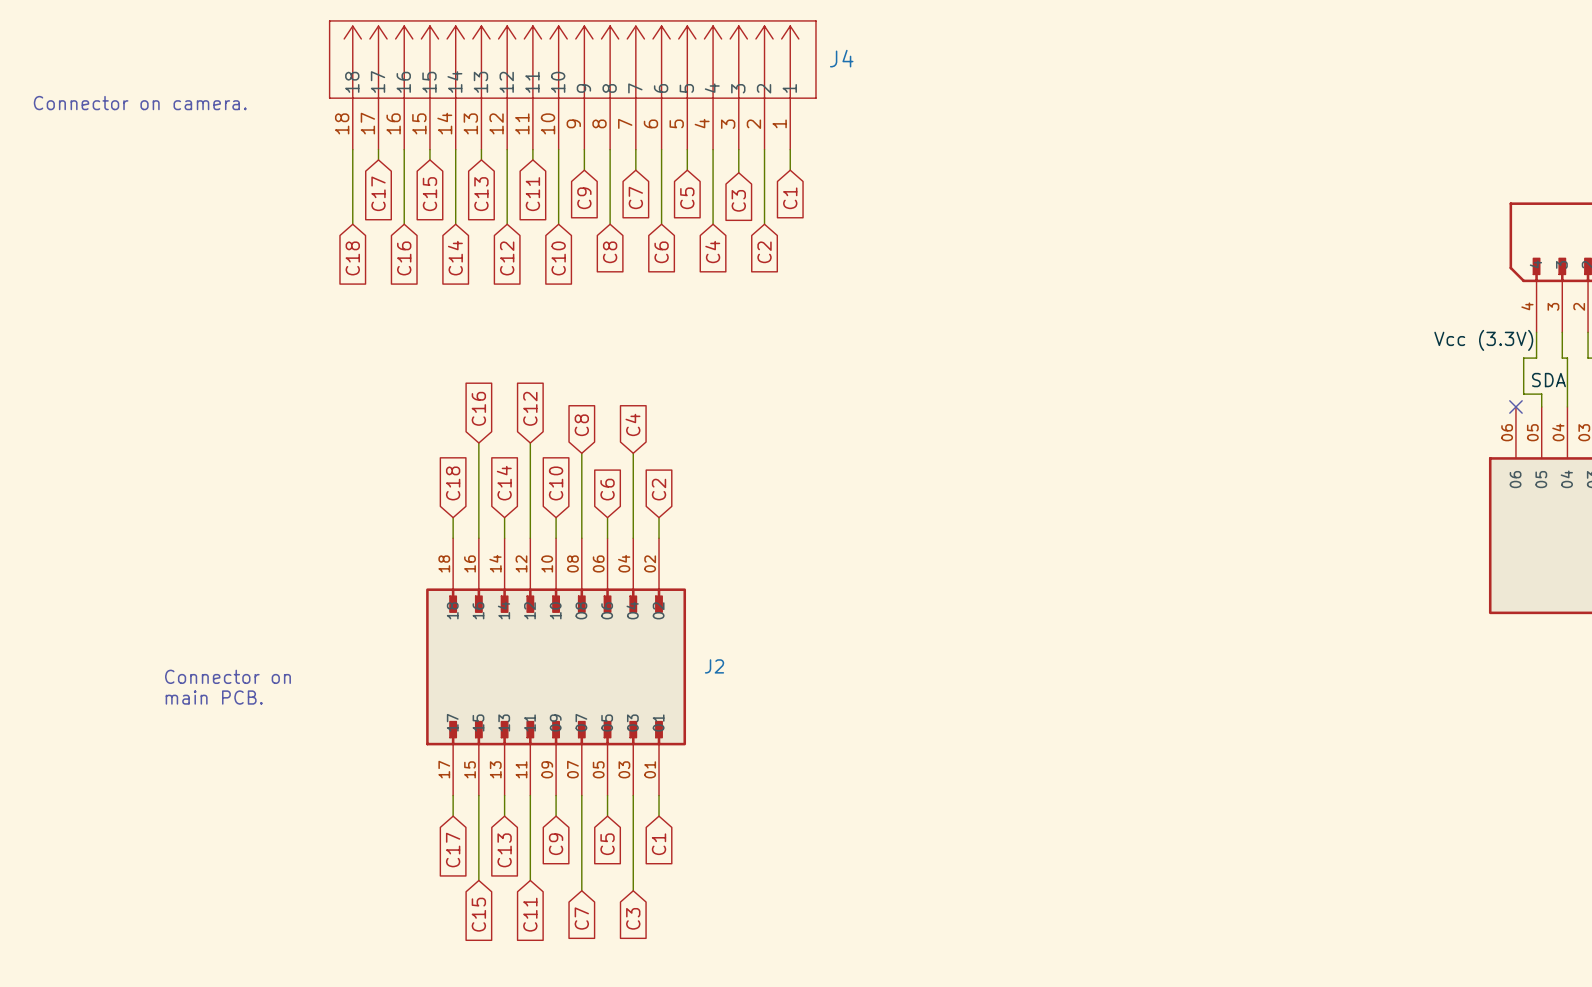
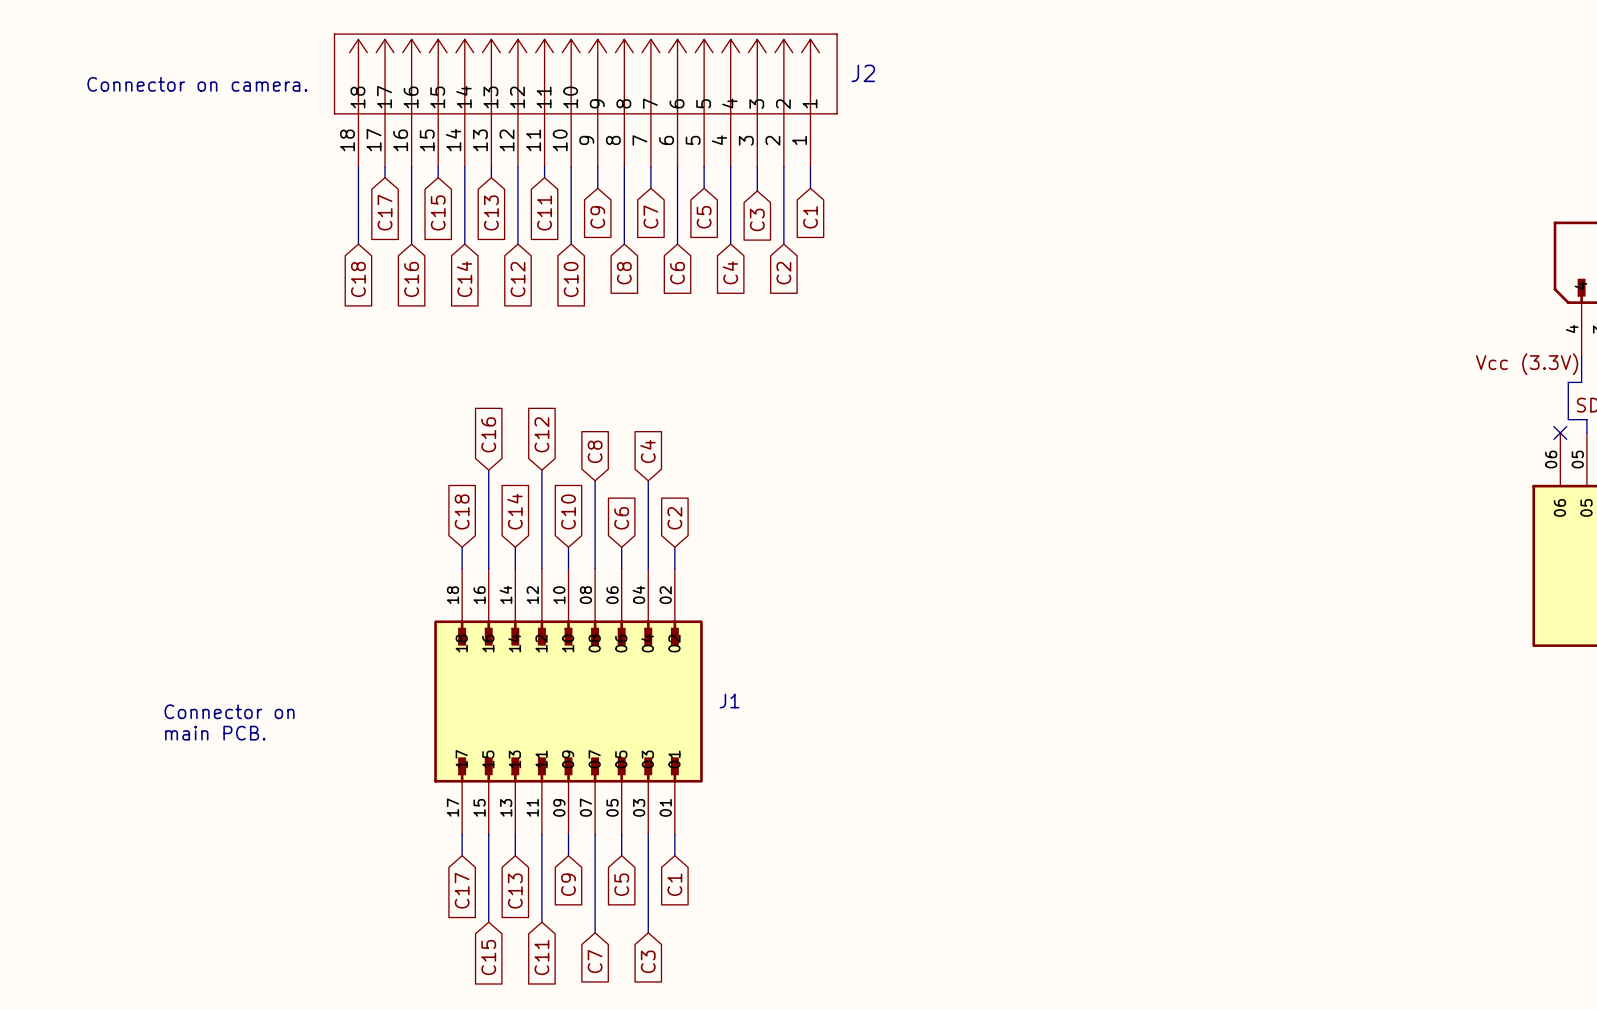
J4 name: J4 (841, 58) -> J2 (863, 73)
text position: Connector on camera. (140, 103) -> Connector on camera. (197, 84)
J2 name: J2 (714, 666) -> J1 (729, 701)

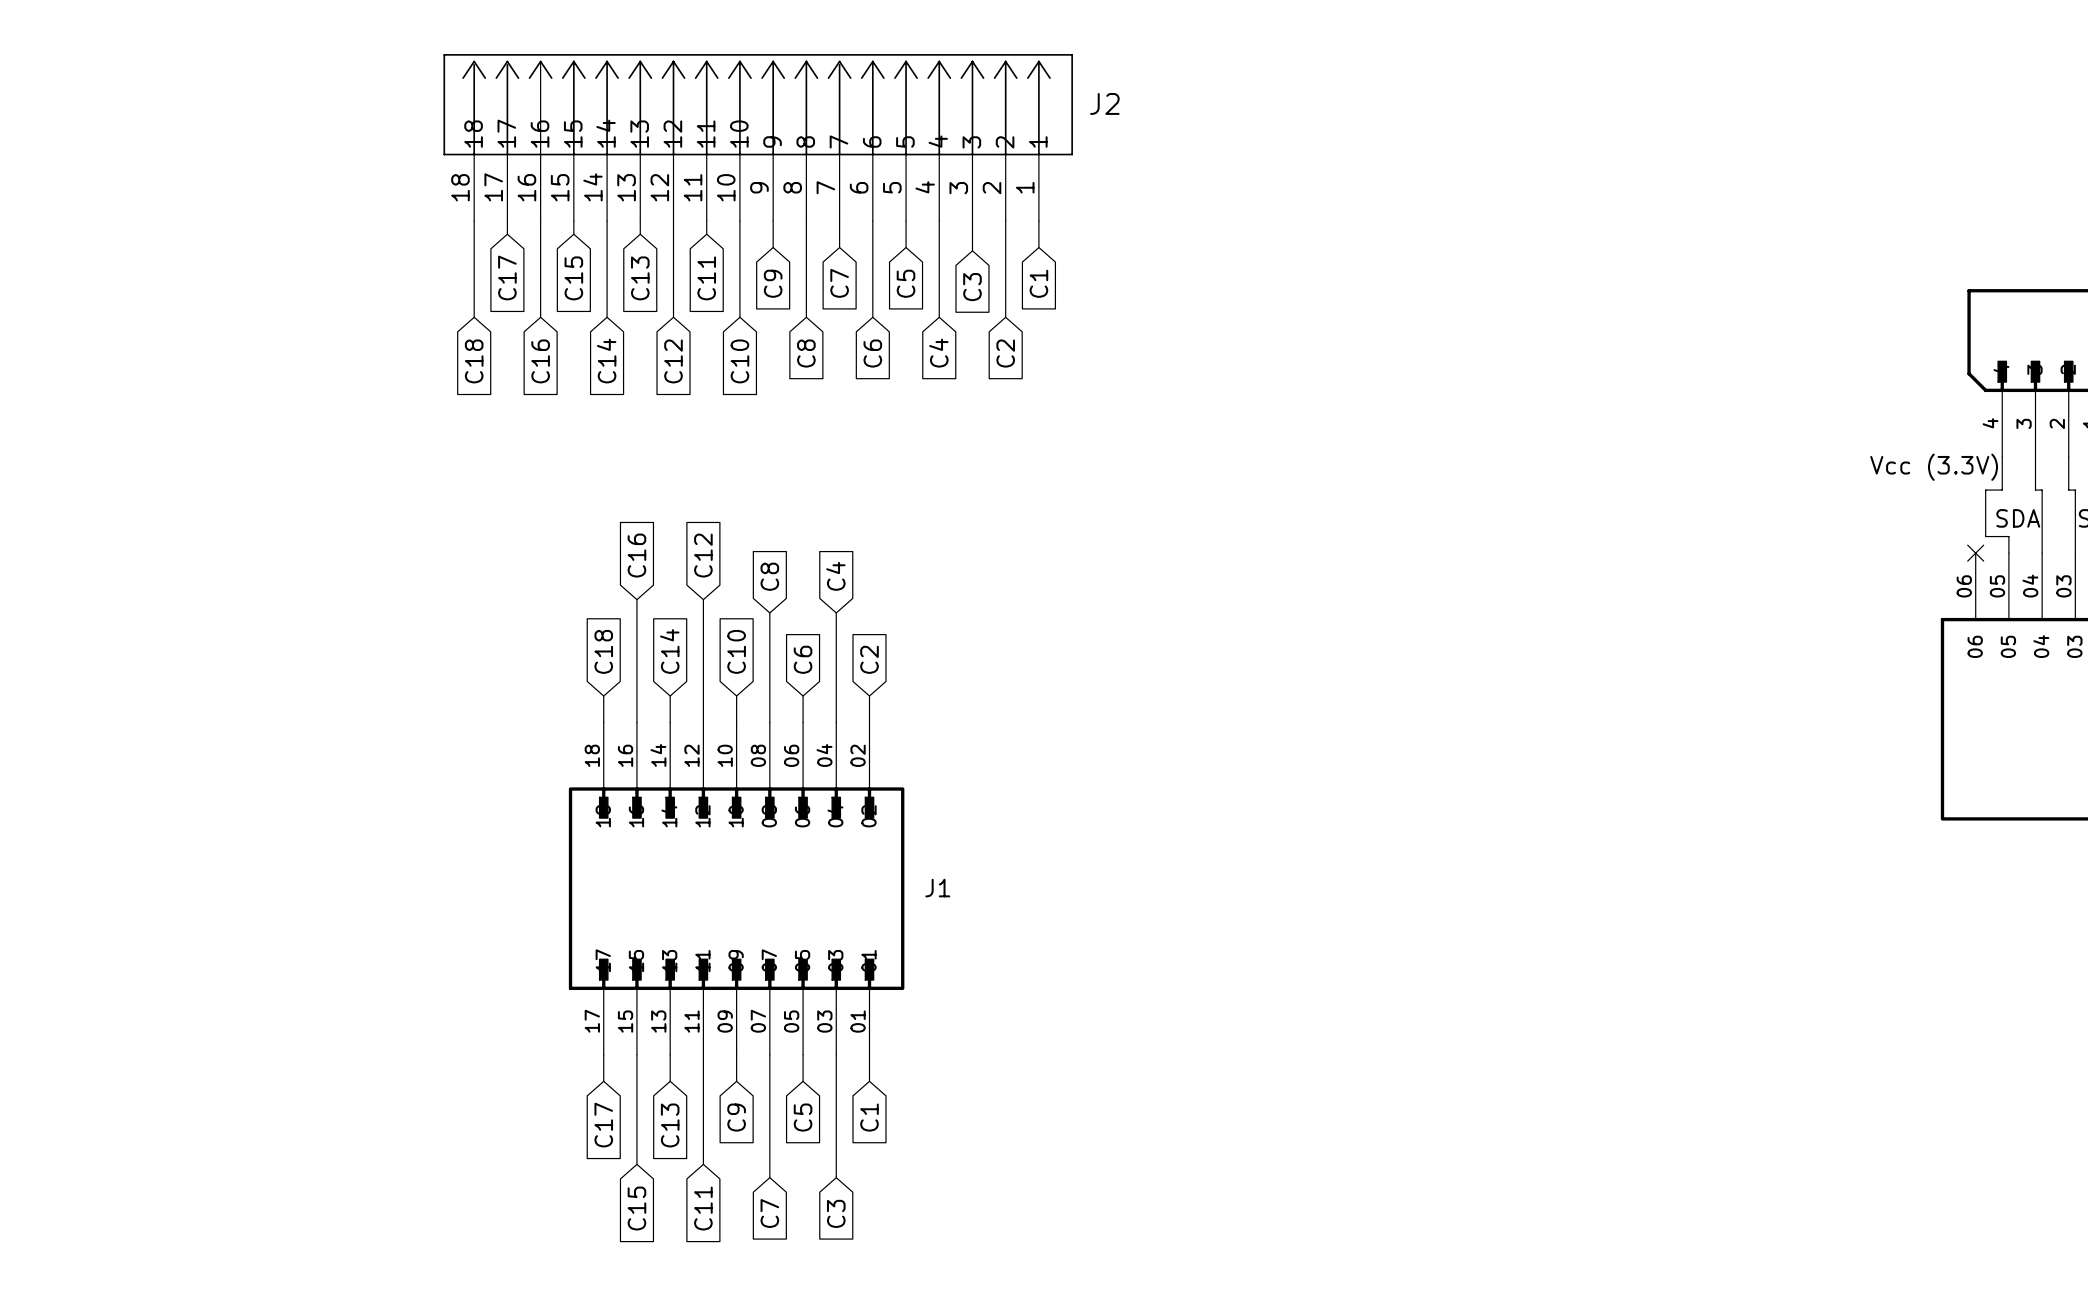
text: Connector on camera. (197, 84) -> none
text: Connector on (229, 711) -> none
text: main PCB. (215, 733) -> none

